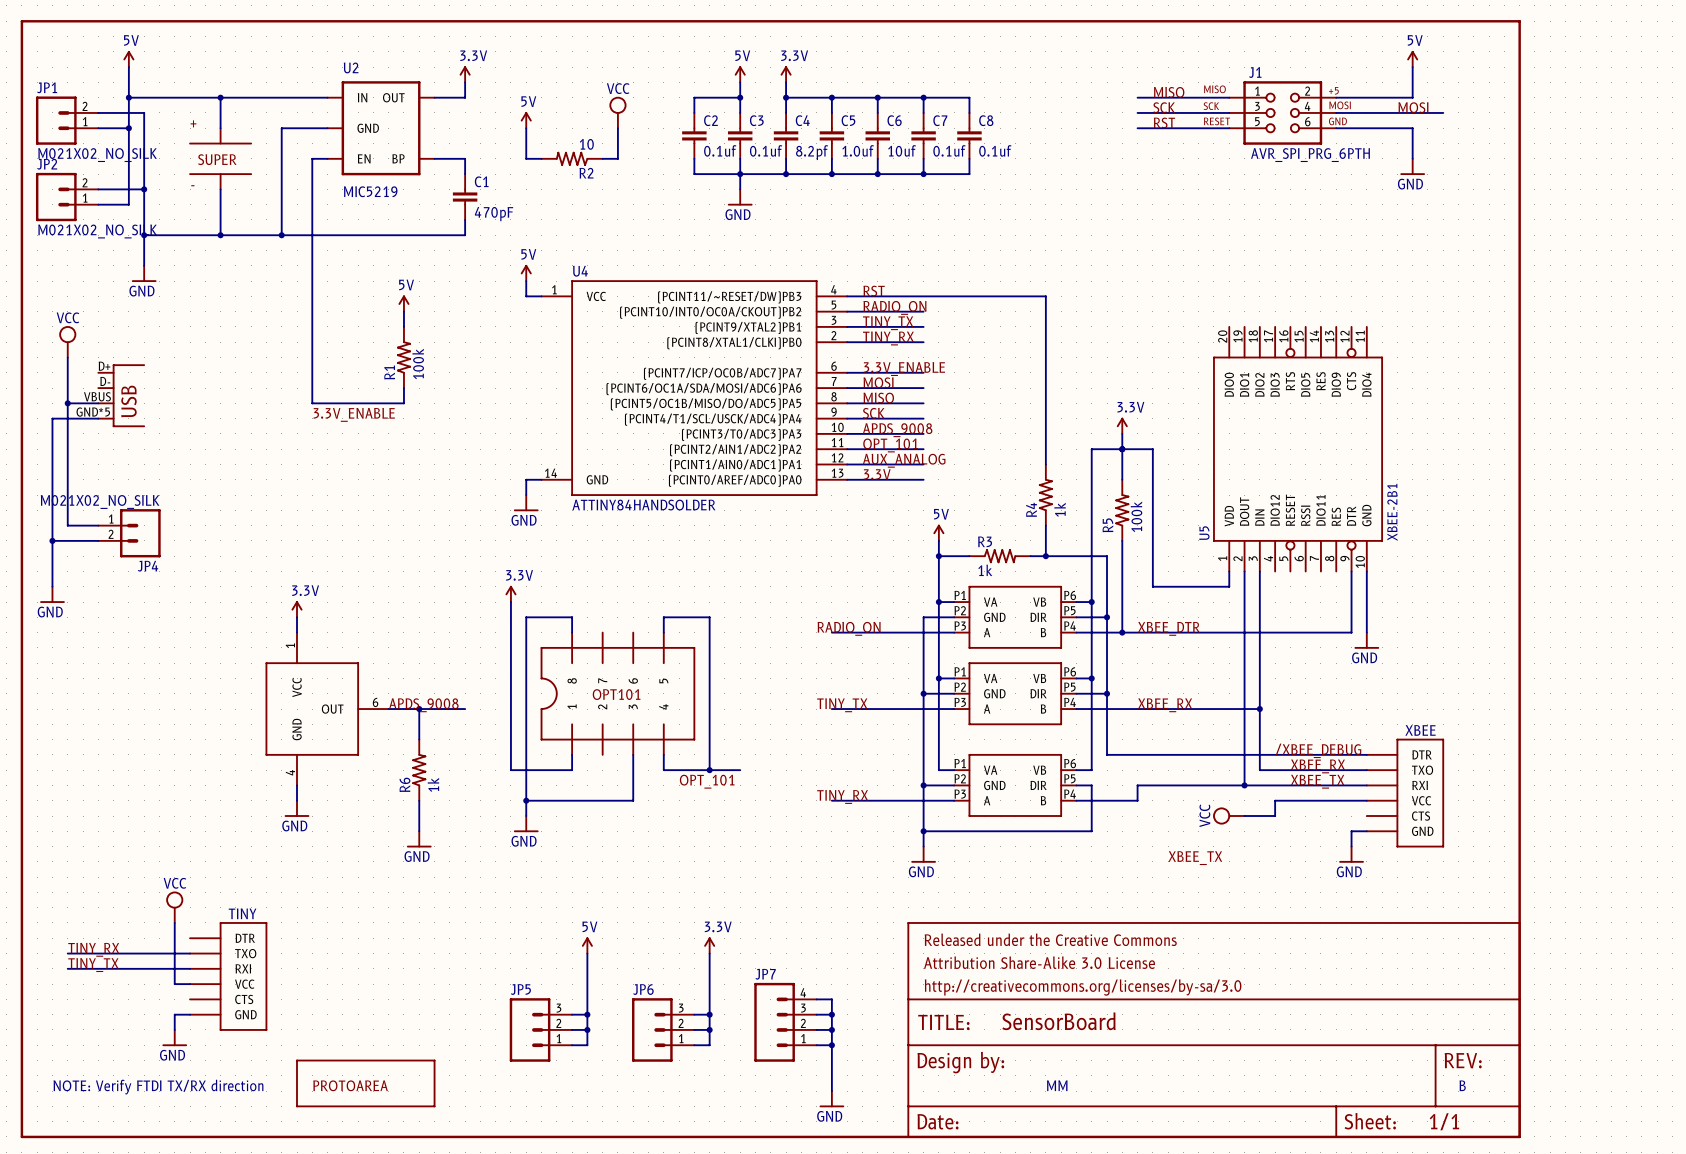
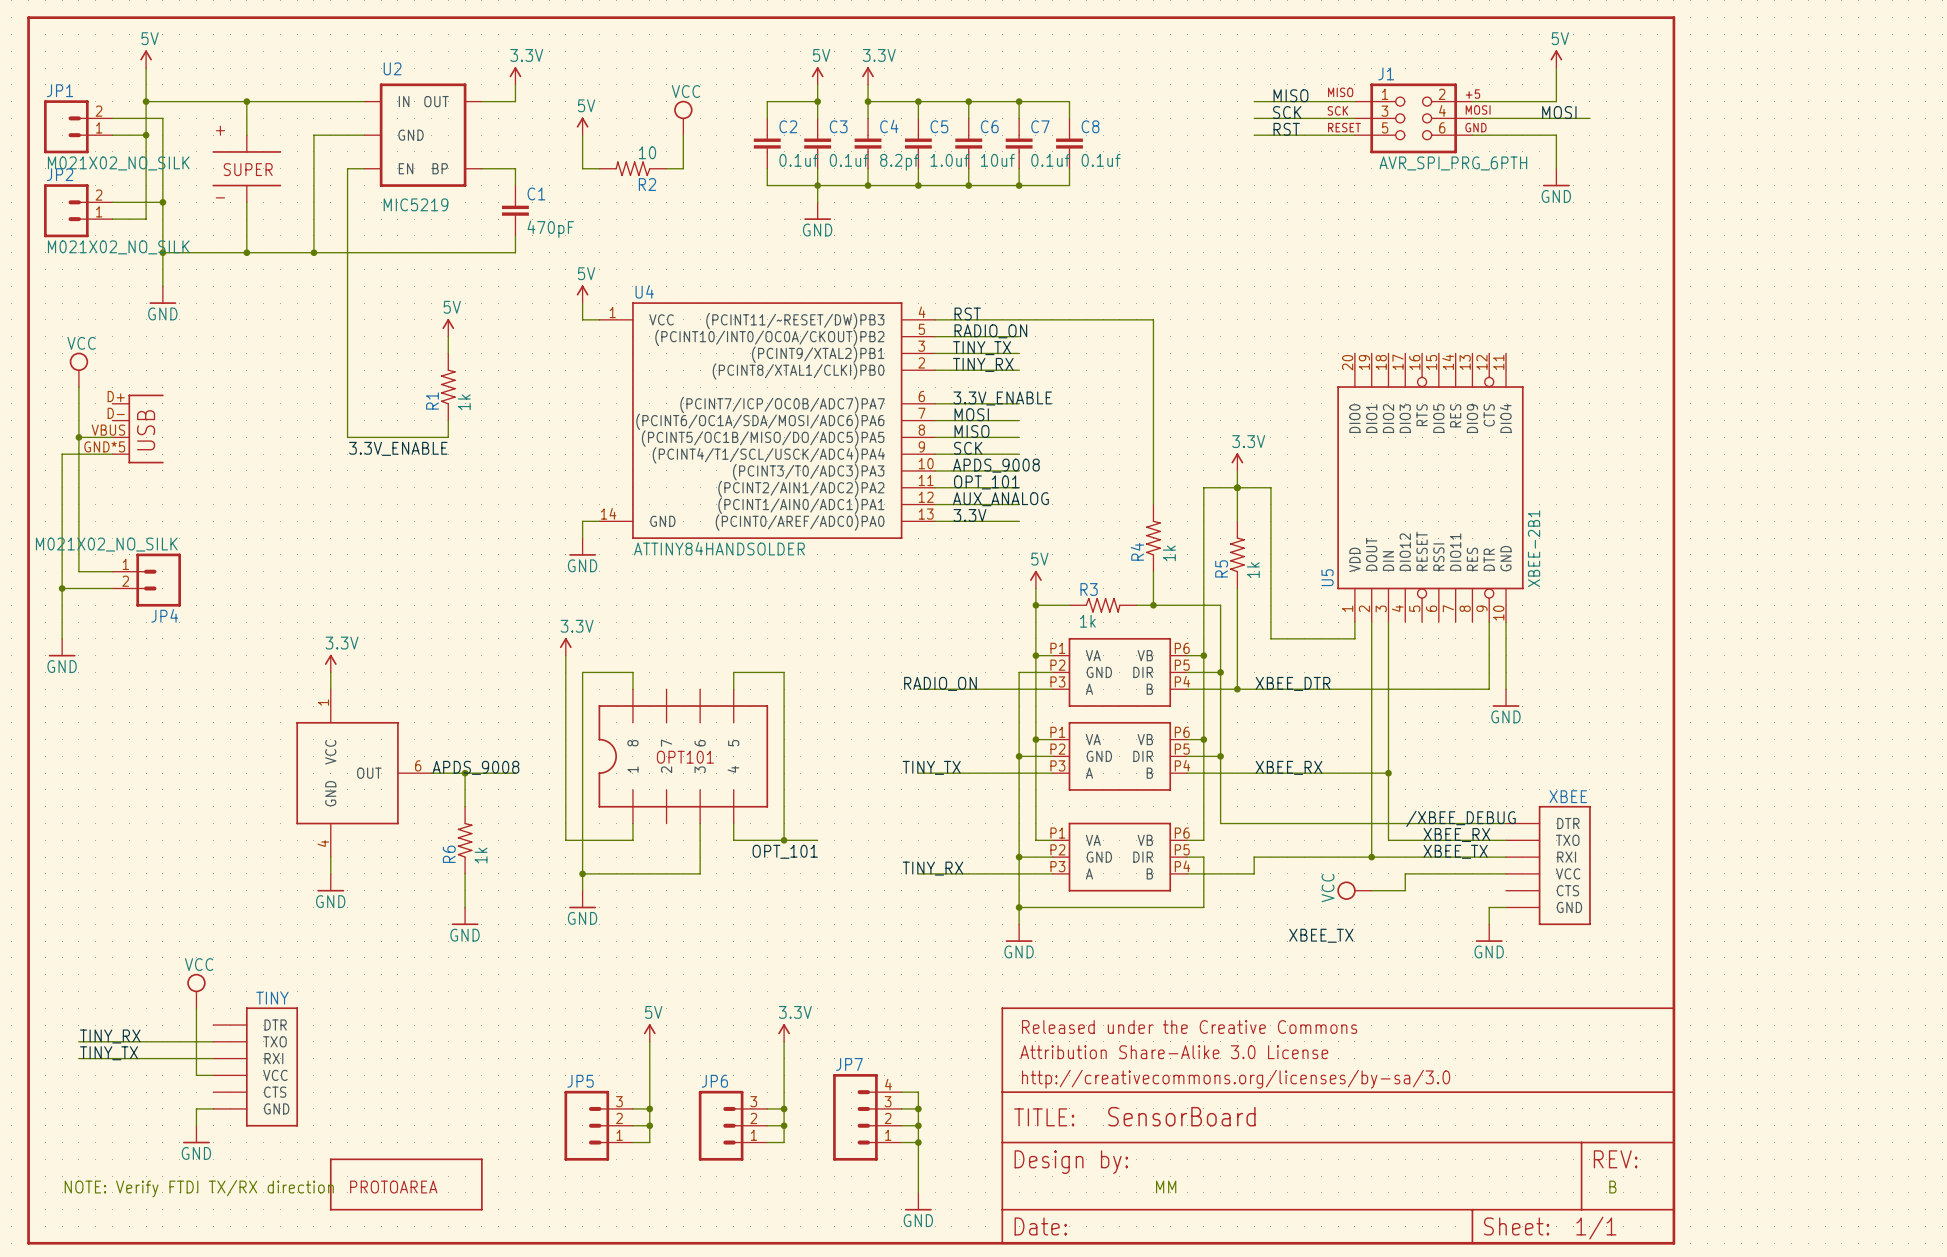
R1 value: 100k (418, 363) -> 1k (464, 402)
R5 value: 100k (1136, 516) -> 1k (1253, 570)

